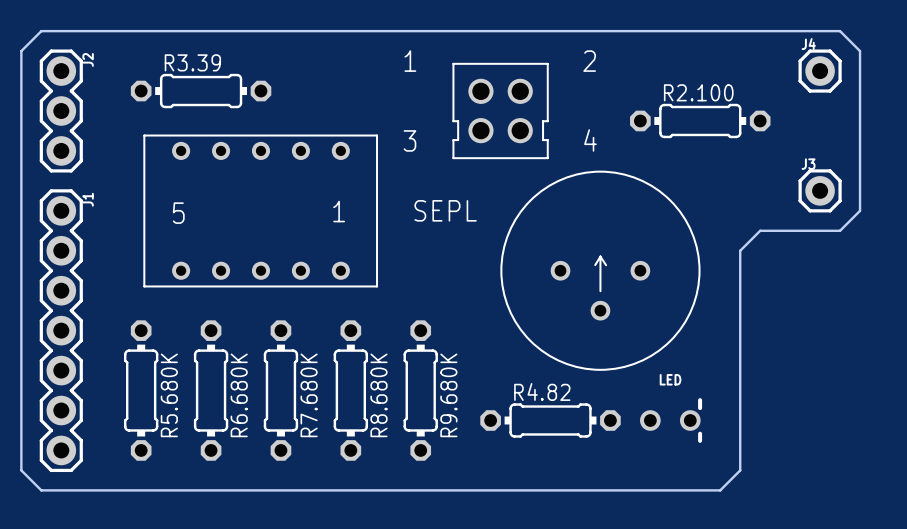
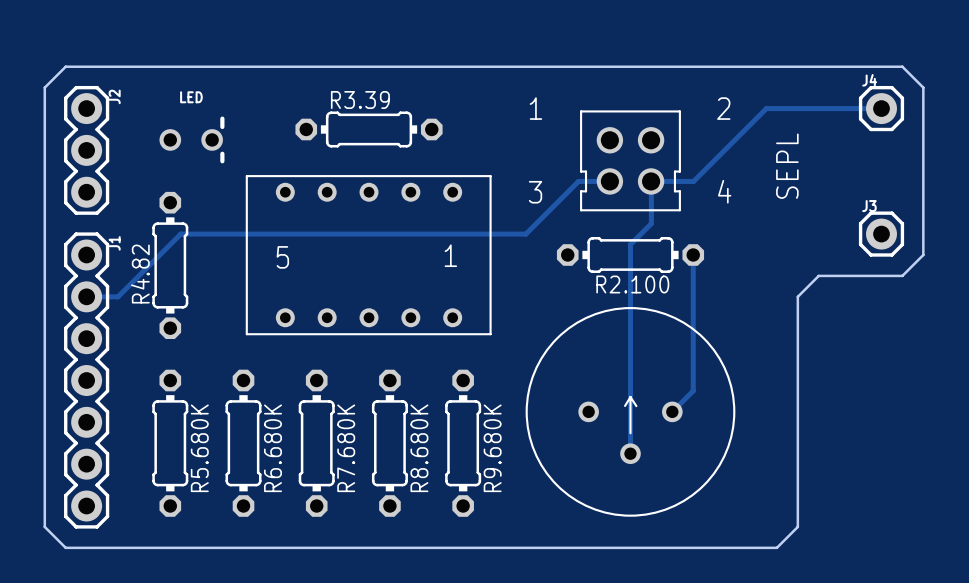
track: none -> (881, 108) (766, 108) (693, 181) (651, 181) (651, 223) (630, 244) (630, 453)
R3.39 position: (201, 91) -> (369, 129)
R2.100 name position: R2.100 (698, 92) -> R2.100 (632, 284)
LED: none -> (191, 139)
part position: (500, 111) -> (630, 160)
R2.100 position: (700, 120) -> (630, 254)
track: none -> (609, 181) (578, 181) (525, 234) (180, 234) (118, 296) (86, 296)
part position: (260, 210) -> (368, 255)
text rotation: 0° (445, 210) -> 90° counterclockwise (787, 166)
text position: SEPL (445, 210) -> SEPL (787, 166)
track: none -> (693, 254) (693, 390) (672, 411)
part position: (600, 270) -> (630, 411)
R4.82 name position: R4.82 (542, 391) -> R4.82 (140, 274)
R4.82 rotation: 0° (550, 420) -> 90° clockwise (170, 265)
R4.82 position: (550, 420) -> (170, 265)
LED: (671, 420) -> none

